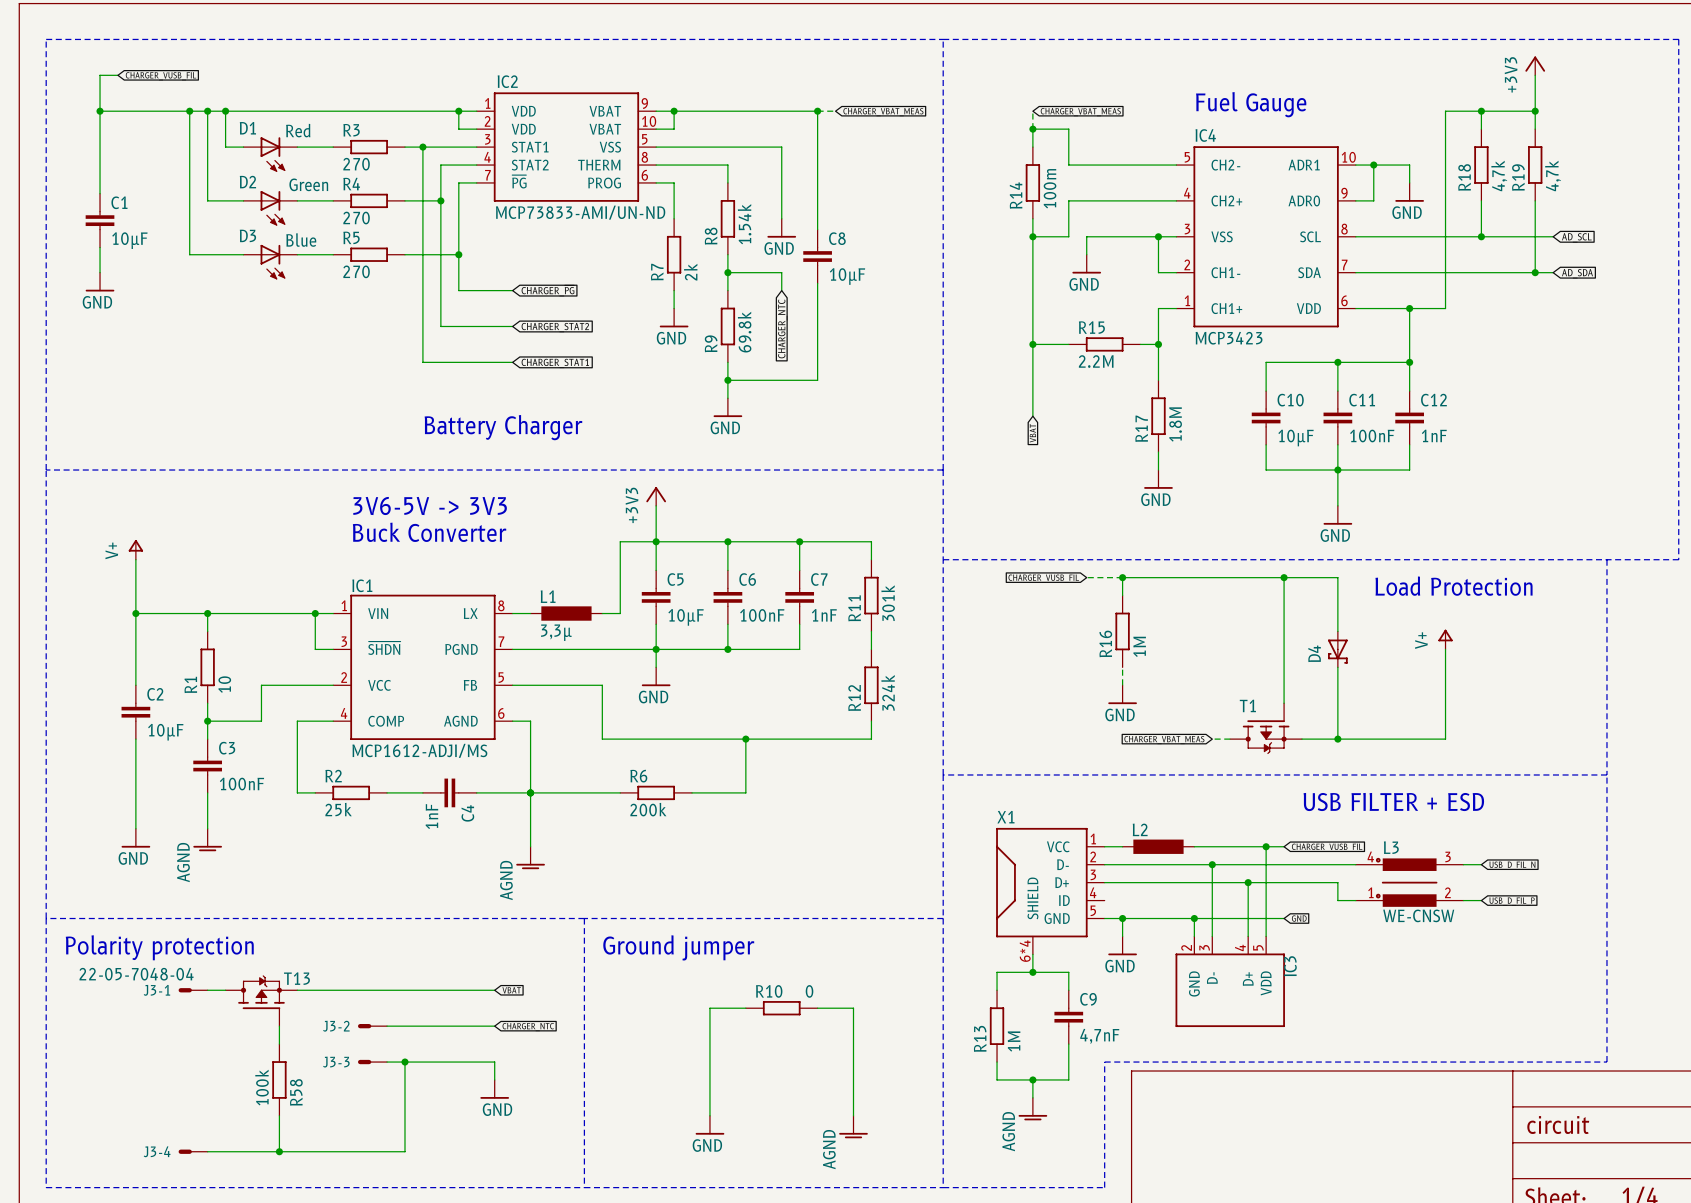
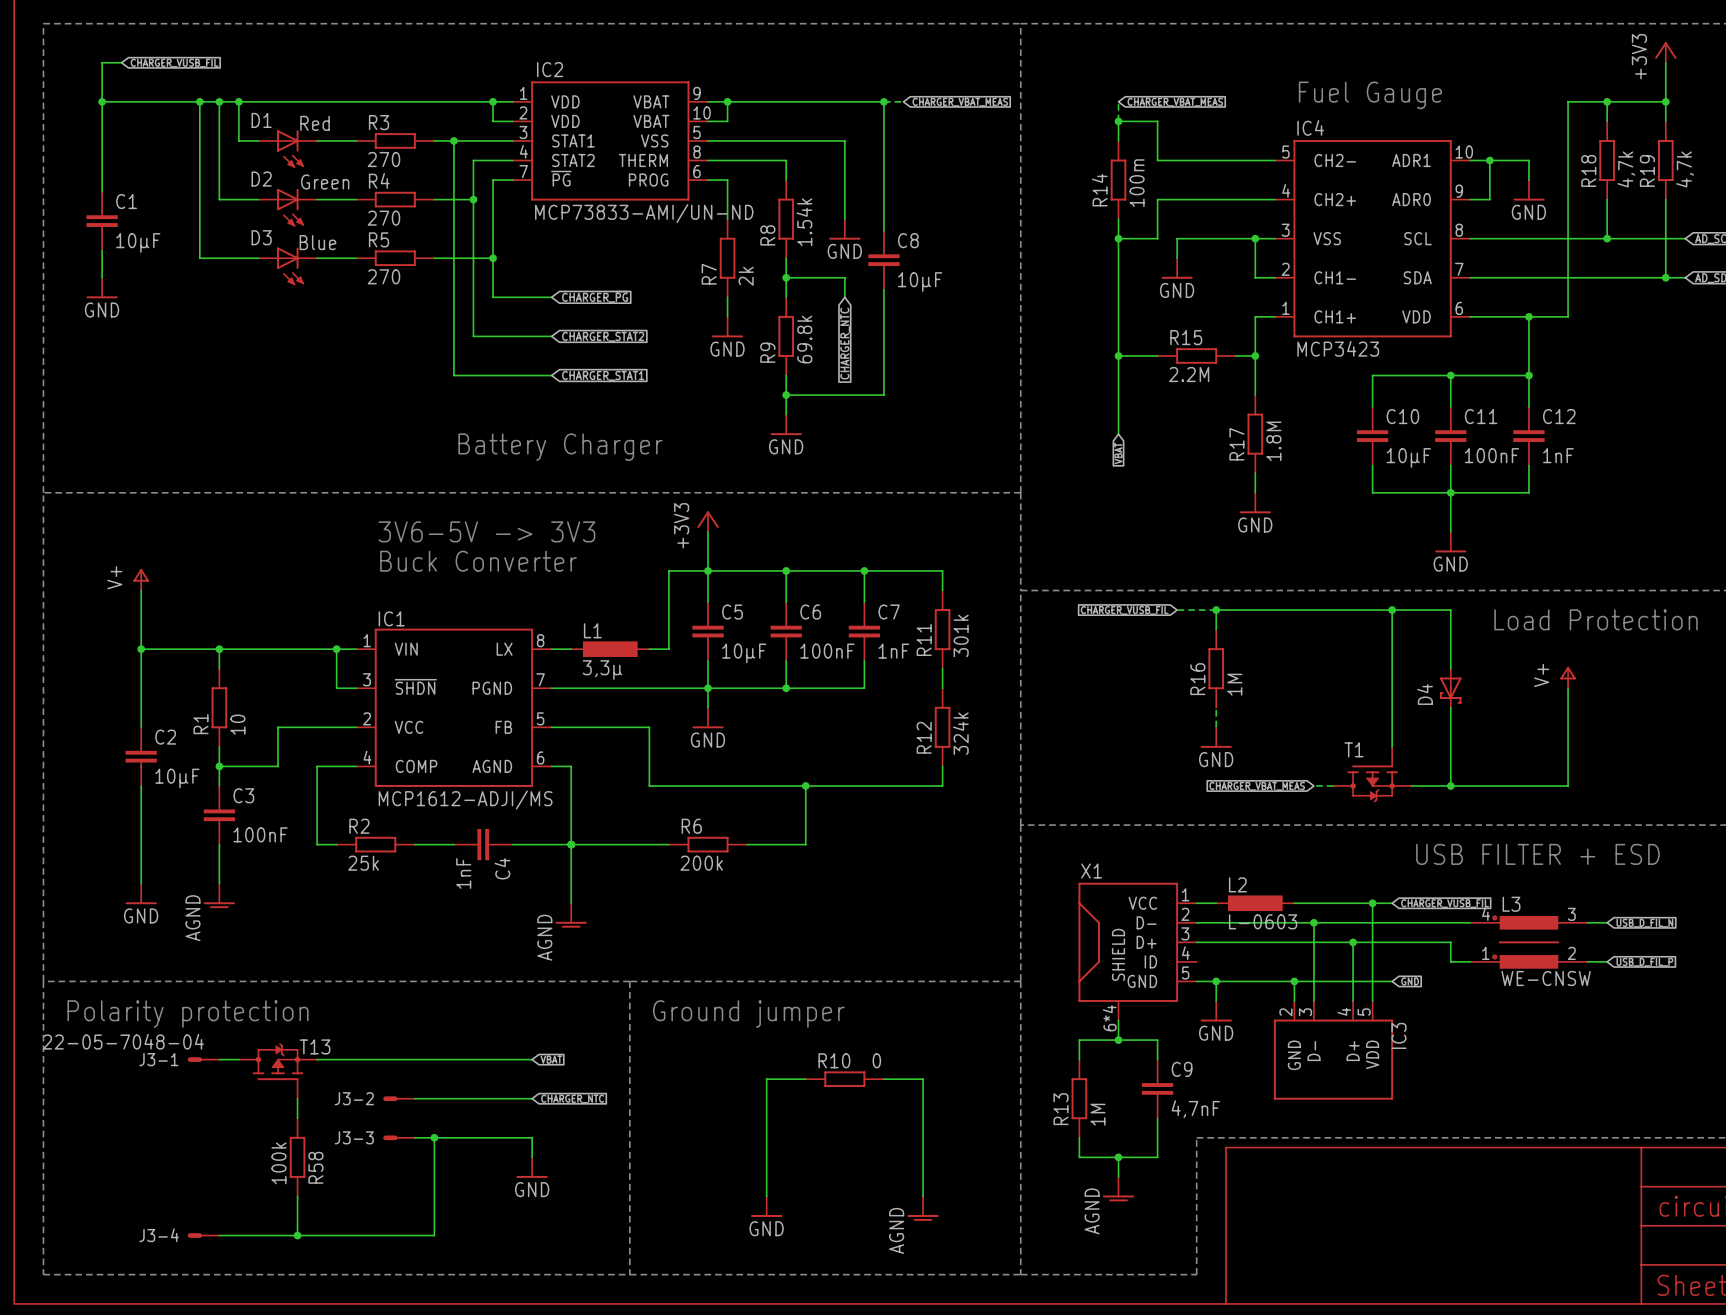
L2 value: none -> L-0603 (1263, 921)

